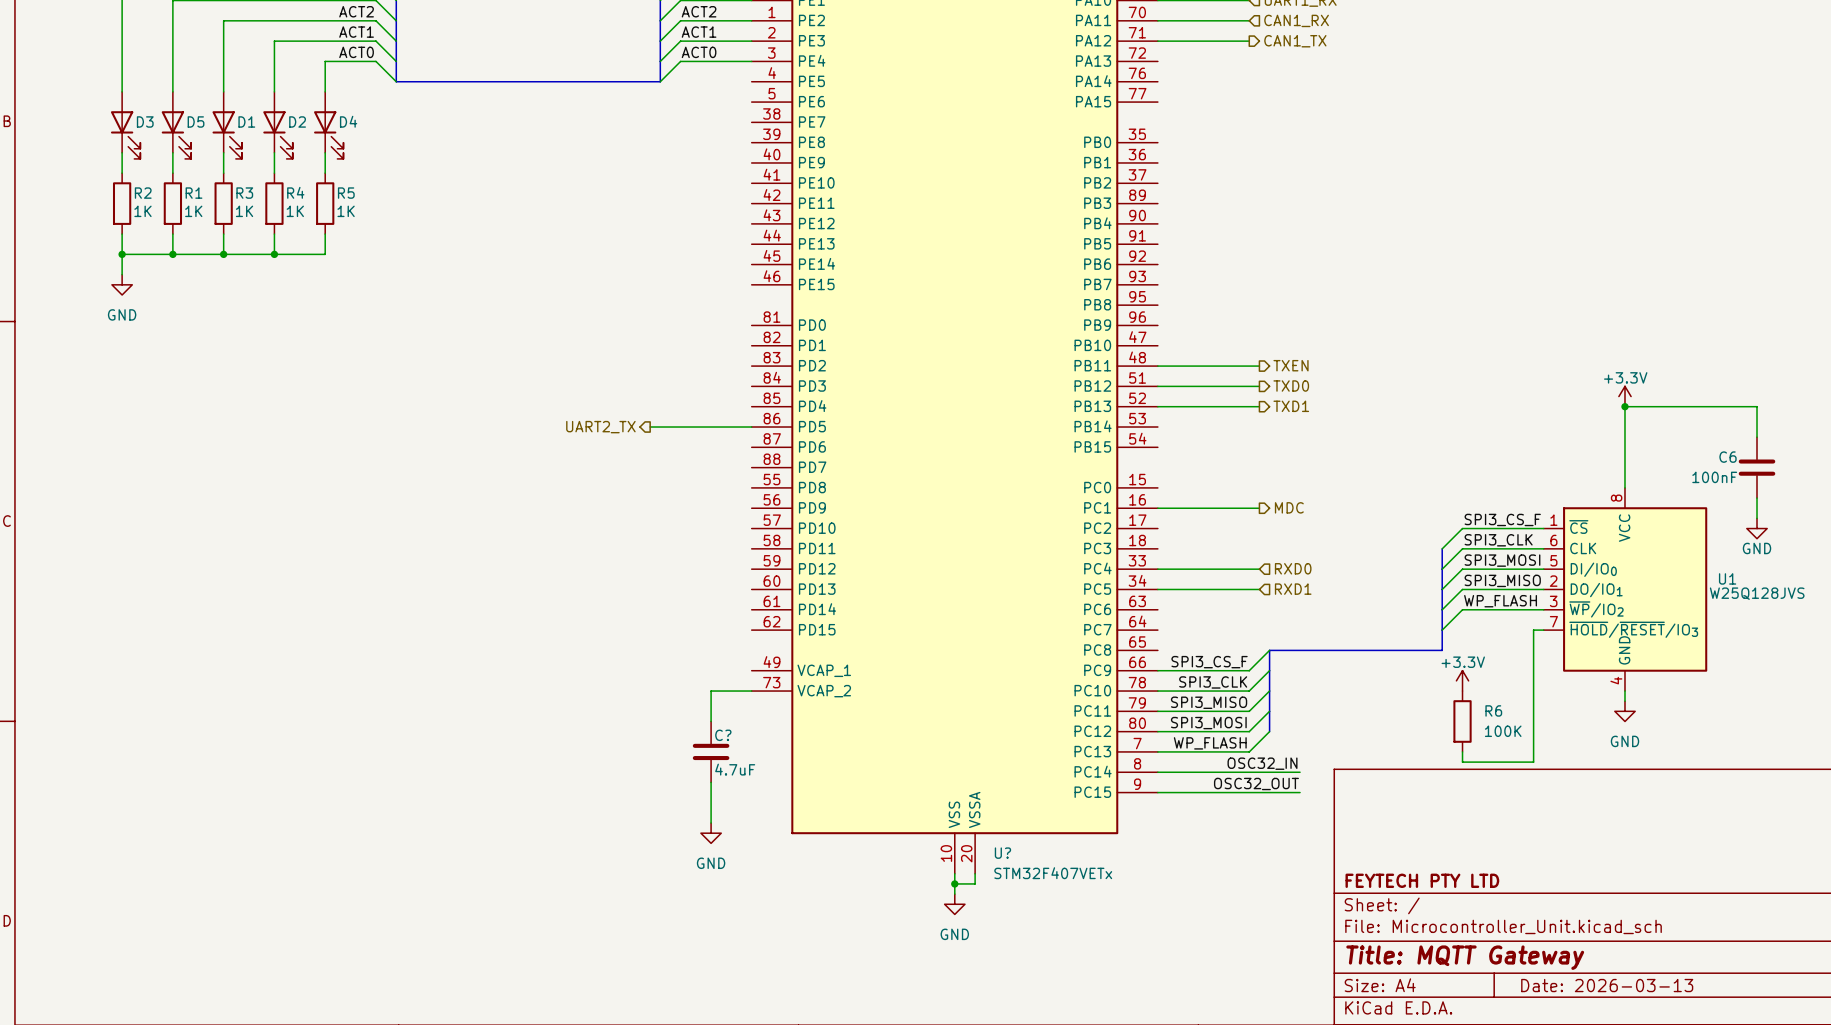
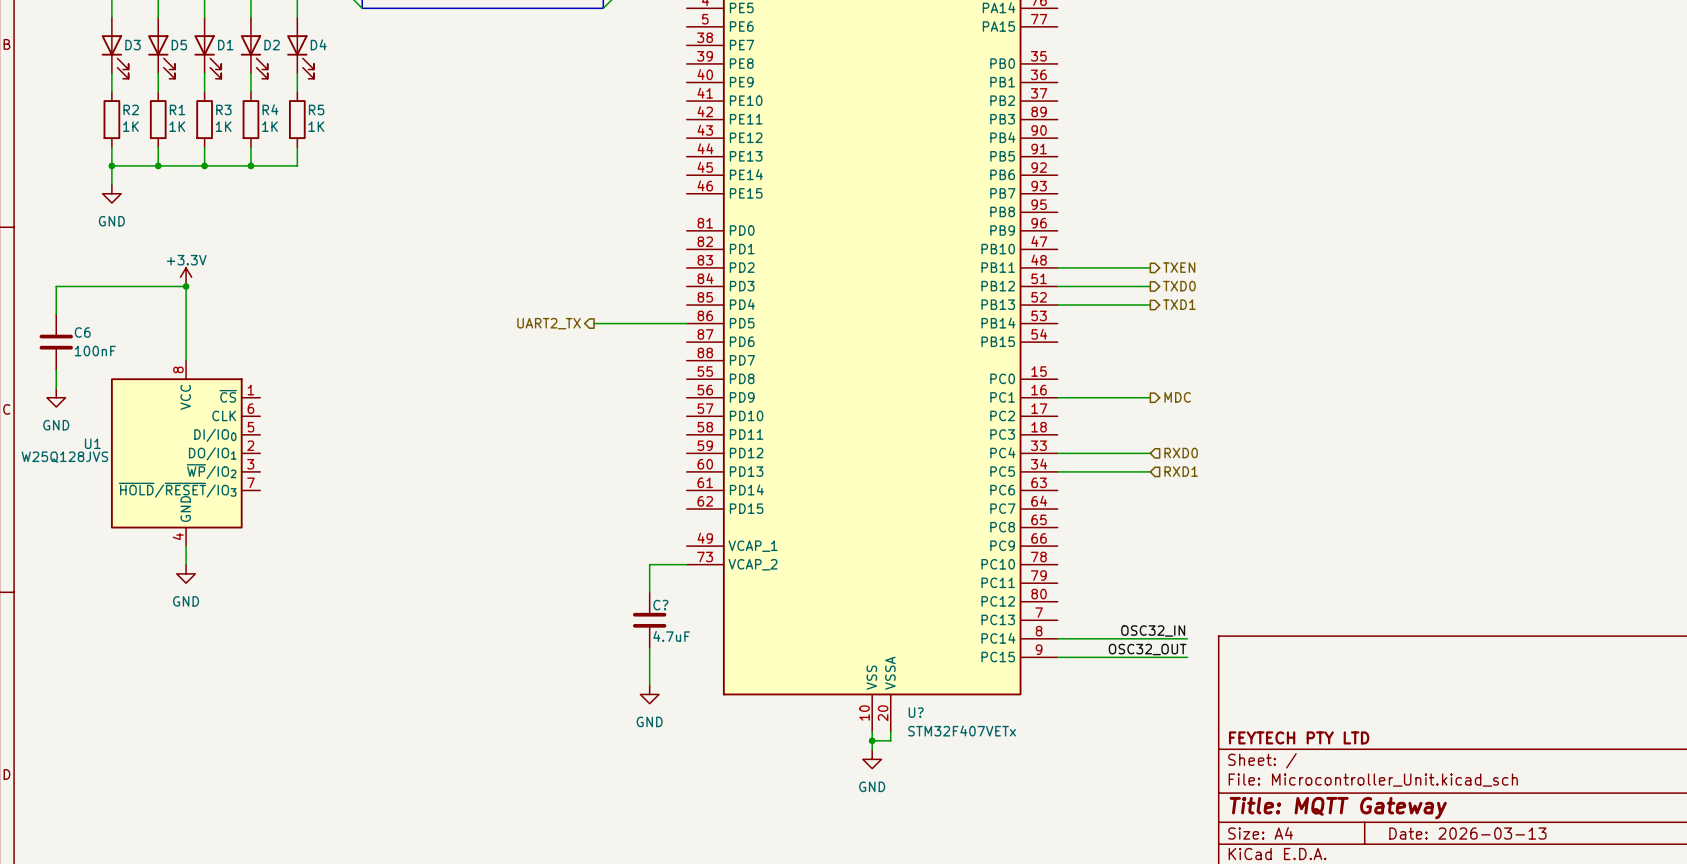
power symbol: none -> +3.3V (186, 277)
junction: none -> (186, 286)
power symbol: +3.3V (1624, 396) -> none
junction: (1624, 406) -> none
wire: none -> (56, 314) (56, 286) (186, 286) (186, 360)
wire: (1757, 437) (1757, 406) (1624, 406) (1624, 487) -> none
C6 name position: C6 (1728, 457) -> C6 (82, 332)
C6 position: (1757, 467) -> (56, 342)
wire: none -> (56, 369) (56, 388)
C6 value position: 100nF (1714, 477) -> 100nF (95, 351)
wire: (1757, 498) (1757, 518) -> none
power symbol: none -> GND (56, 397)
label: SPI3_CS_F (1502, 519) -> none
wire: (1543, 528) (1462, 528) (1442, 548) -> none
power symbol: GND (1757, 528) -> none
label: SPI3_CLK (1498, 540) -> none
bus: (1442, 548) (1442, 650) (1269, 650) (1269, 731) -> none
wire: (1543, 548) (1462, 548) (1442, 569) -> none
label: SPI3_MOSI (1502, 560) -> none
wire: (1543, 569) (1462, 569) (1442, 589) -> none
label: SPI3_MISO (1502, 580) -> none
wire: (1543, 589) (1462, 589) (1442, 609) -> none
U1 position: (1625, 589) -> (185, 453)
U1 flip: as is (1635, 589) -> left-right (176, 453)
label: WP_FLASH (1500, 601) -> none
wire: (1543, 609) (1462, 609) (1442, 630) -> none
wire: (1543, 630) (1533, 630) (1533, 762) (1462, 762) (1462, 751) -> none
wire: (1269, 650) (1249, 670) (1157, 670) -> none
label: SPI3_CS_F (1209, 662) -> none
wire: none -> (186, 546) (186, 564)
wire: (1269, 670) (1249, 691) (1157, 691) -> none
power symbol: +3.3V (1462, 680) -> none
label: SPI3_CLK (1213, 682) -> none
wire: (1269, 691) (1249, 711) (1157, 711) -> none
wire: (1624, 691) (1624, 701) -> none
power symbol: none -> GND (186, 573)
label: SPI3_MISO (1209, 702) -> none
wire: (1269, 711) (1249, 731) (1157, 731) -> none
power symbol: GND (1624, 711) -> none
R6: 100K (1462, 721) -> none
label: SPI3_MOSI (1208, 723) -> none
wire: (1269, 731) (1249, 751) (1157, 751) -> none
label: WP_FLASH (1210, 743) -> none

